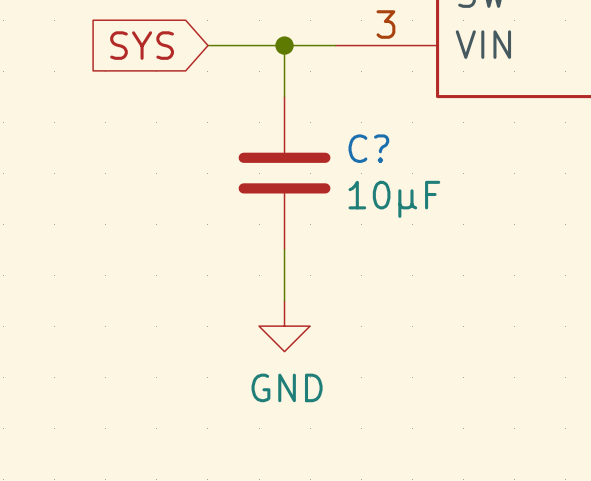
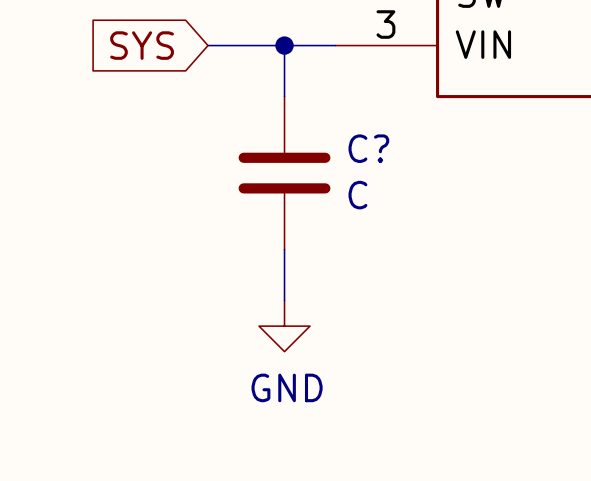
C? value: 10µF (394, 199) -> C (357, 195)

